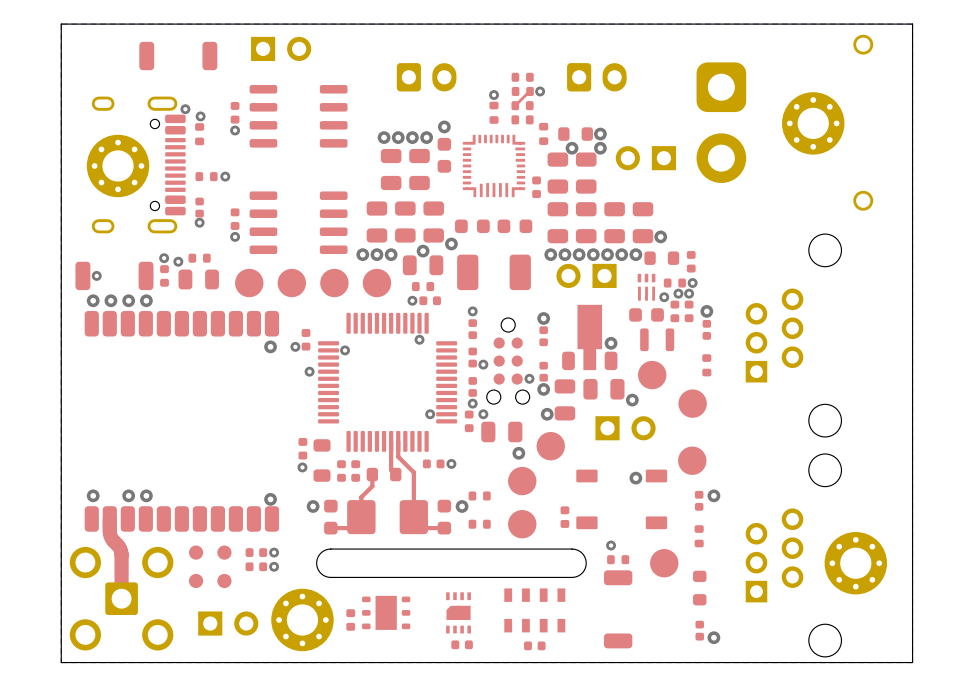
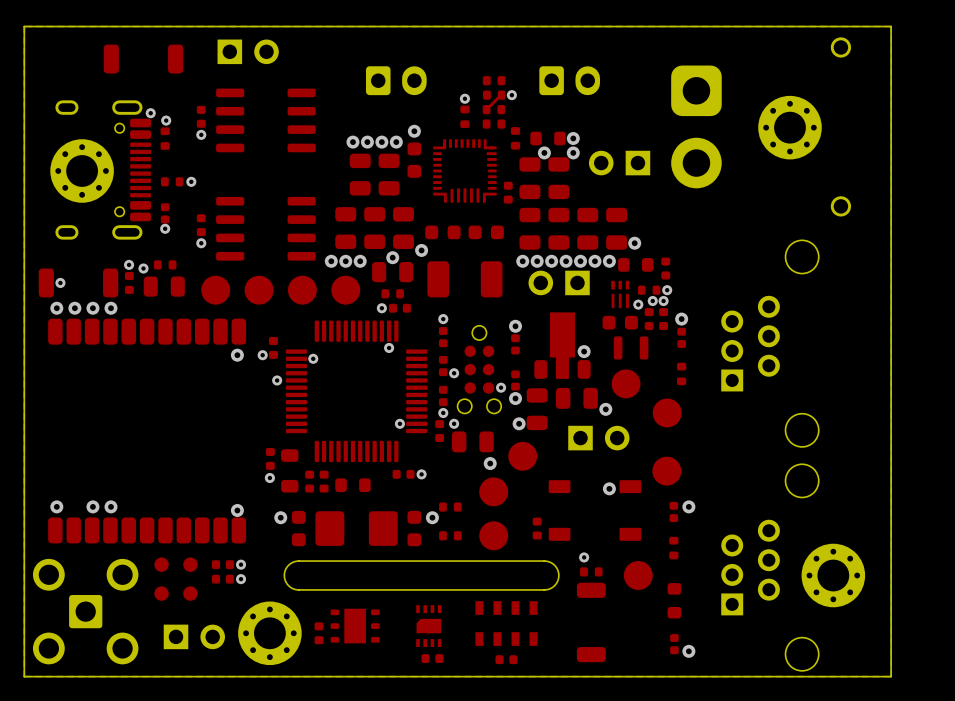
top track: (391, 441) (391, 469) (395, 474) -> none
top track: (398, 441) (398, 456) (413, 472) (413, 517) (424, 528) (444, 528) -> none
top track: (372, 474) (372, 486) (361, 497) (361, 517) (350, 528) (330, 528) -> none
top track: (109, 518) (110, 535) (121, 553) (121, 598) -> none

